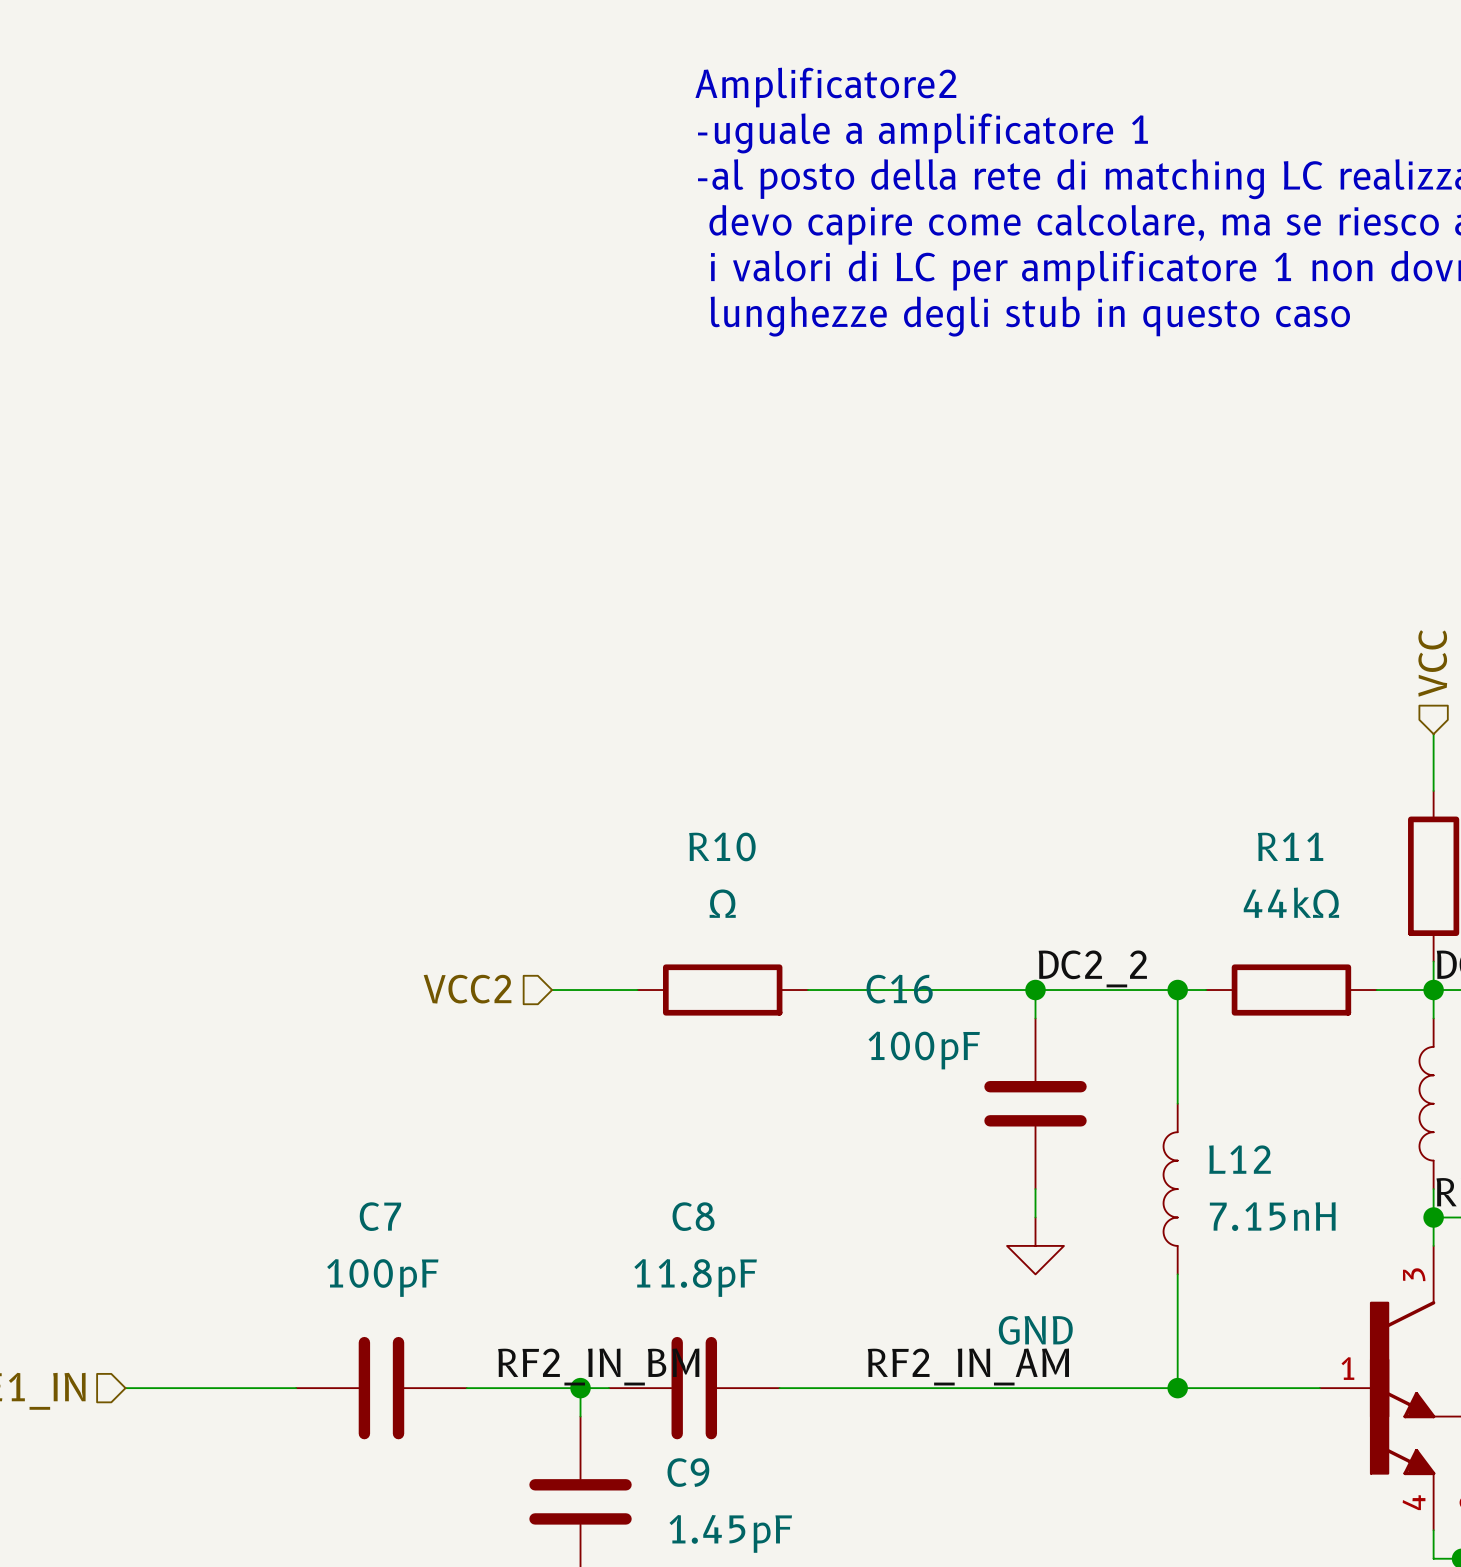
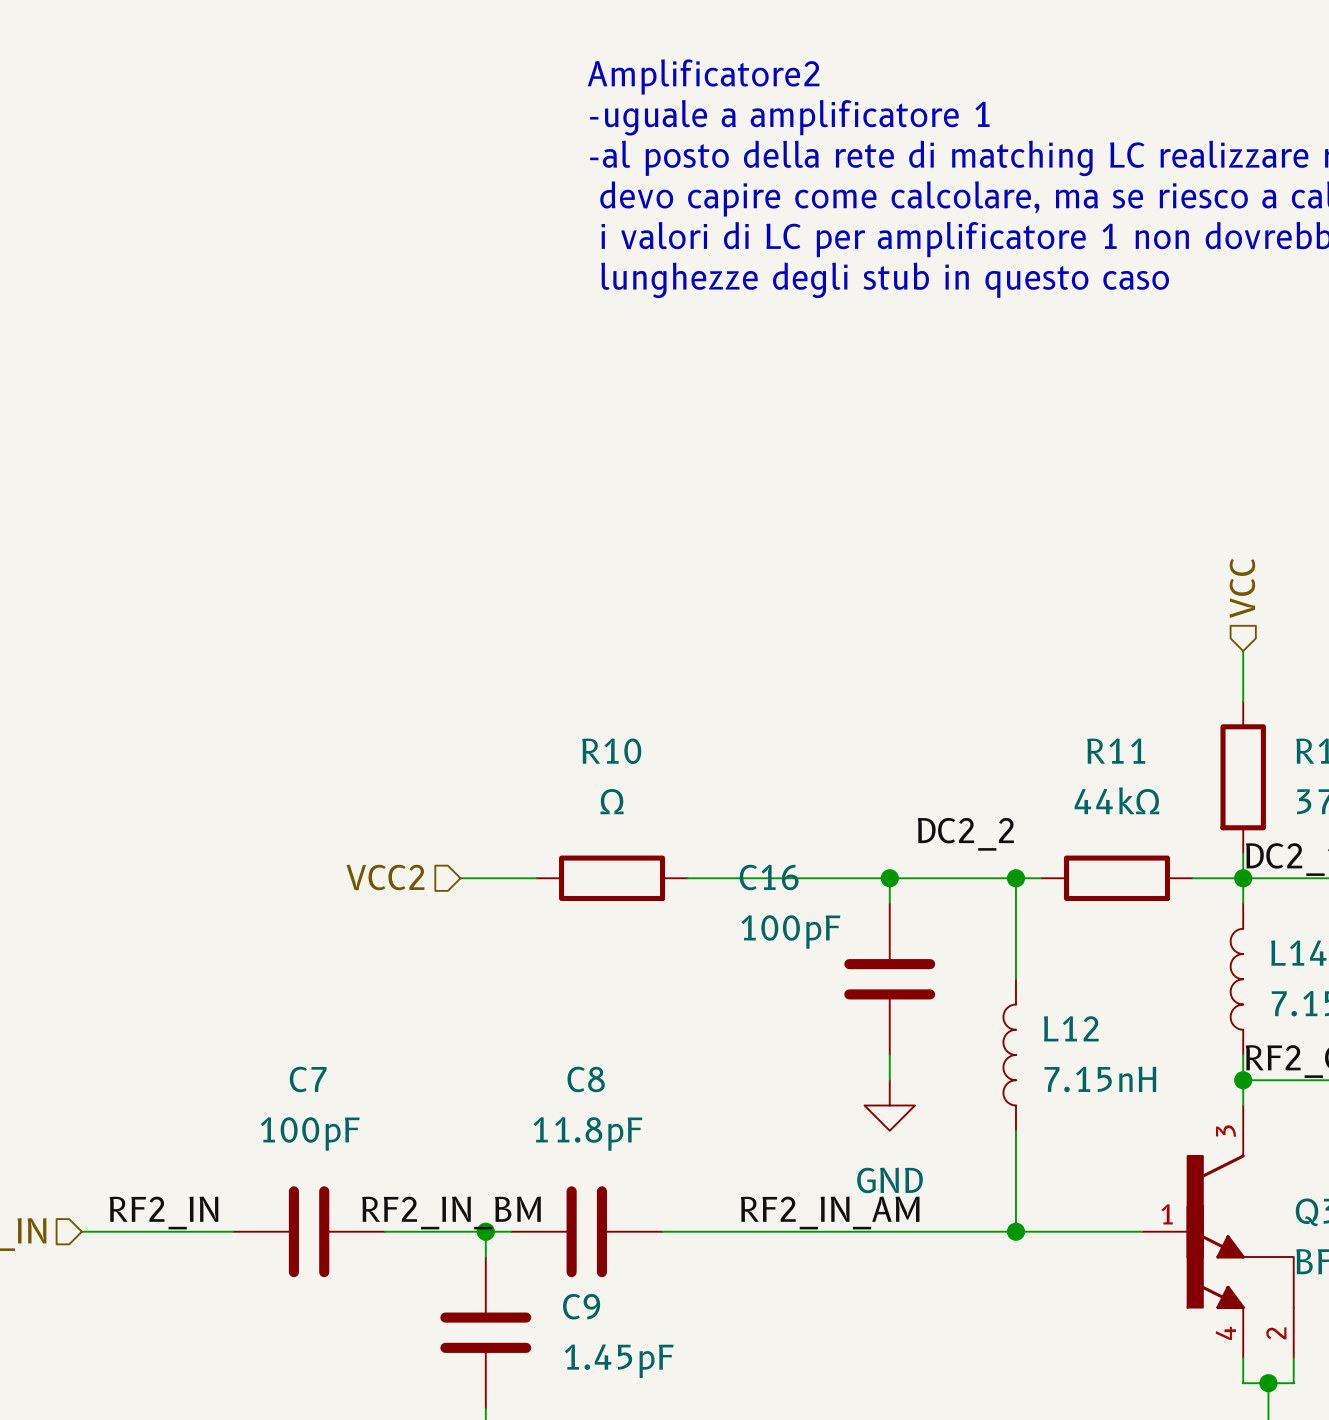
label position: DC2_2 (1092, 968) -> DC2_2 (965, 834)
label: none -> RF2_IN (163, 1212)
label position: RF2_IN_BM (598, 1367) -> RF2_IN_BM (451, 1212)

